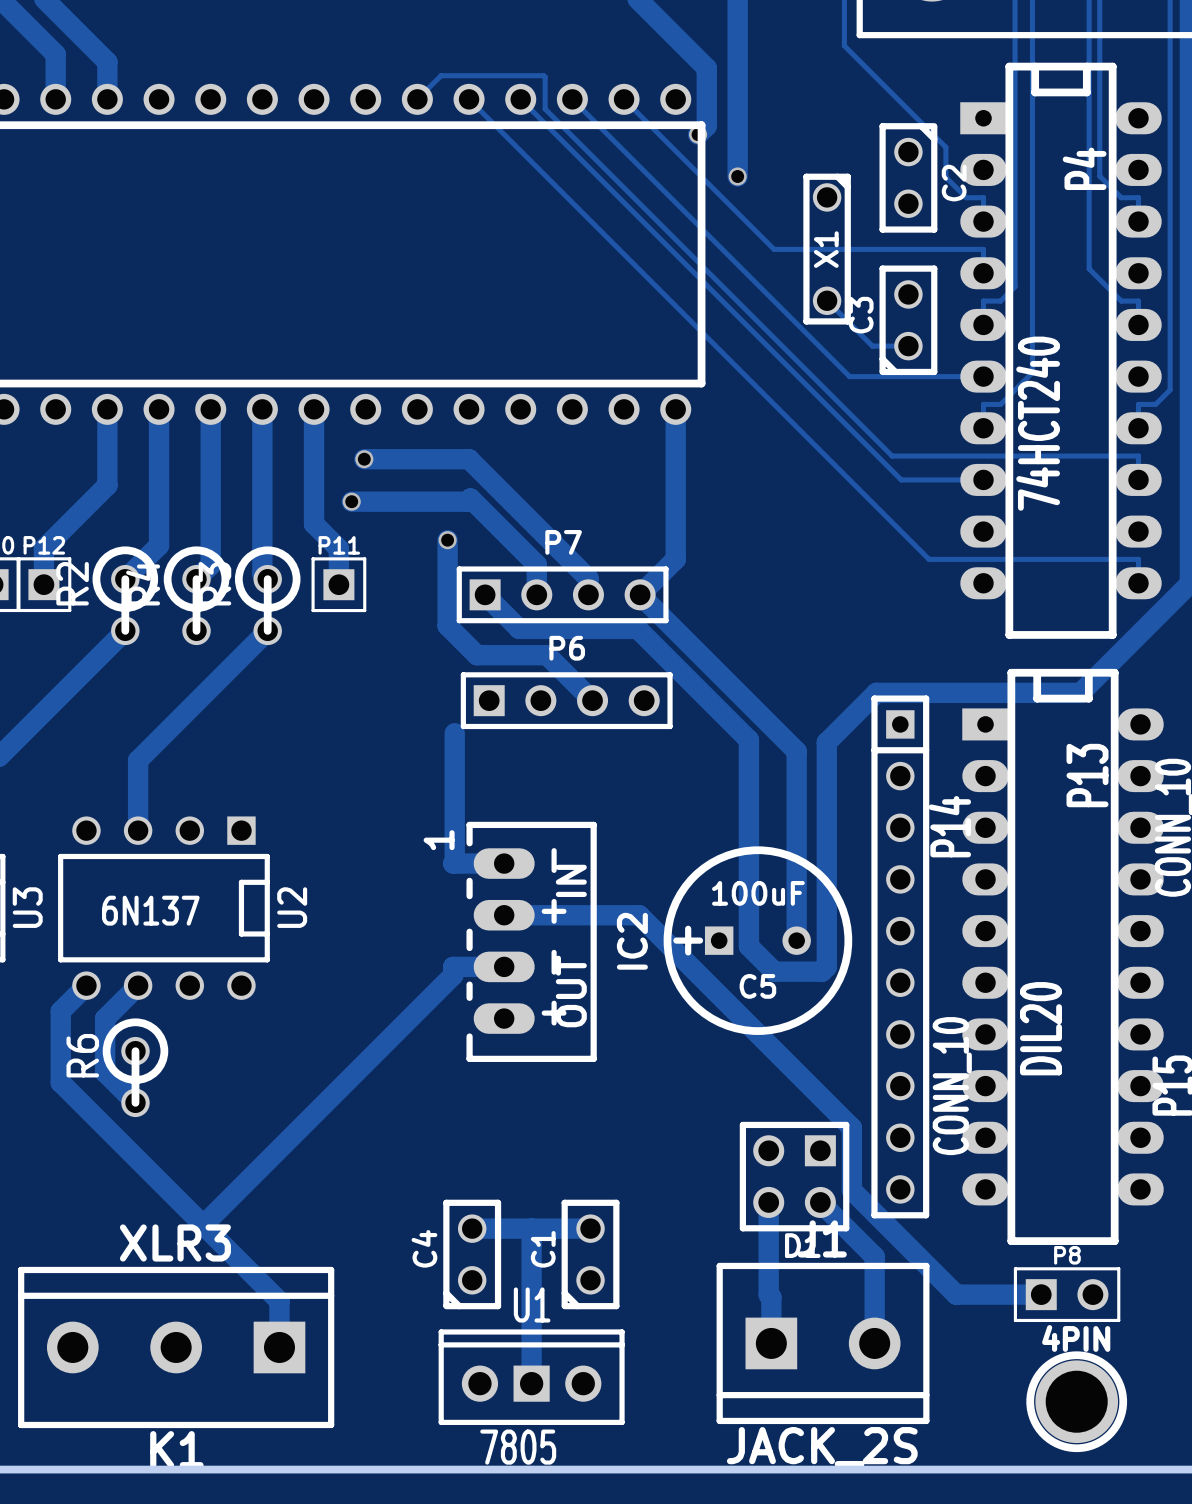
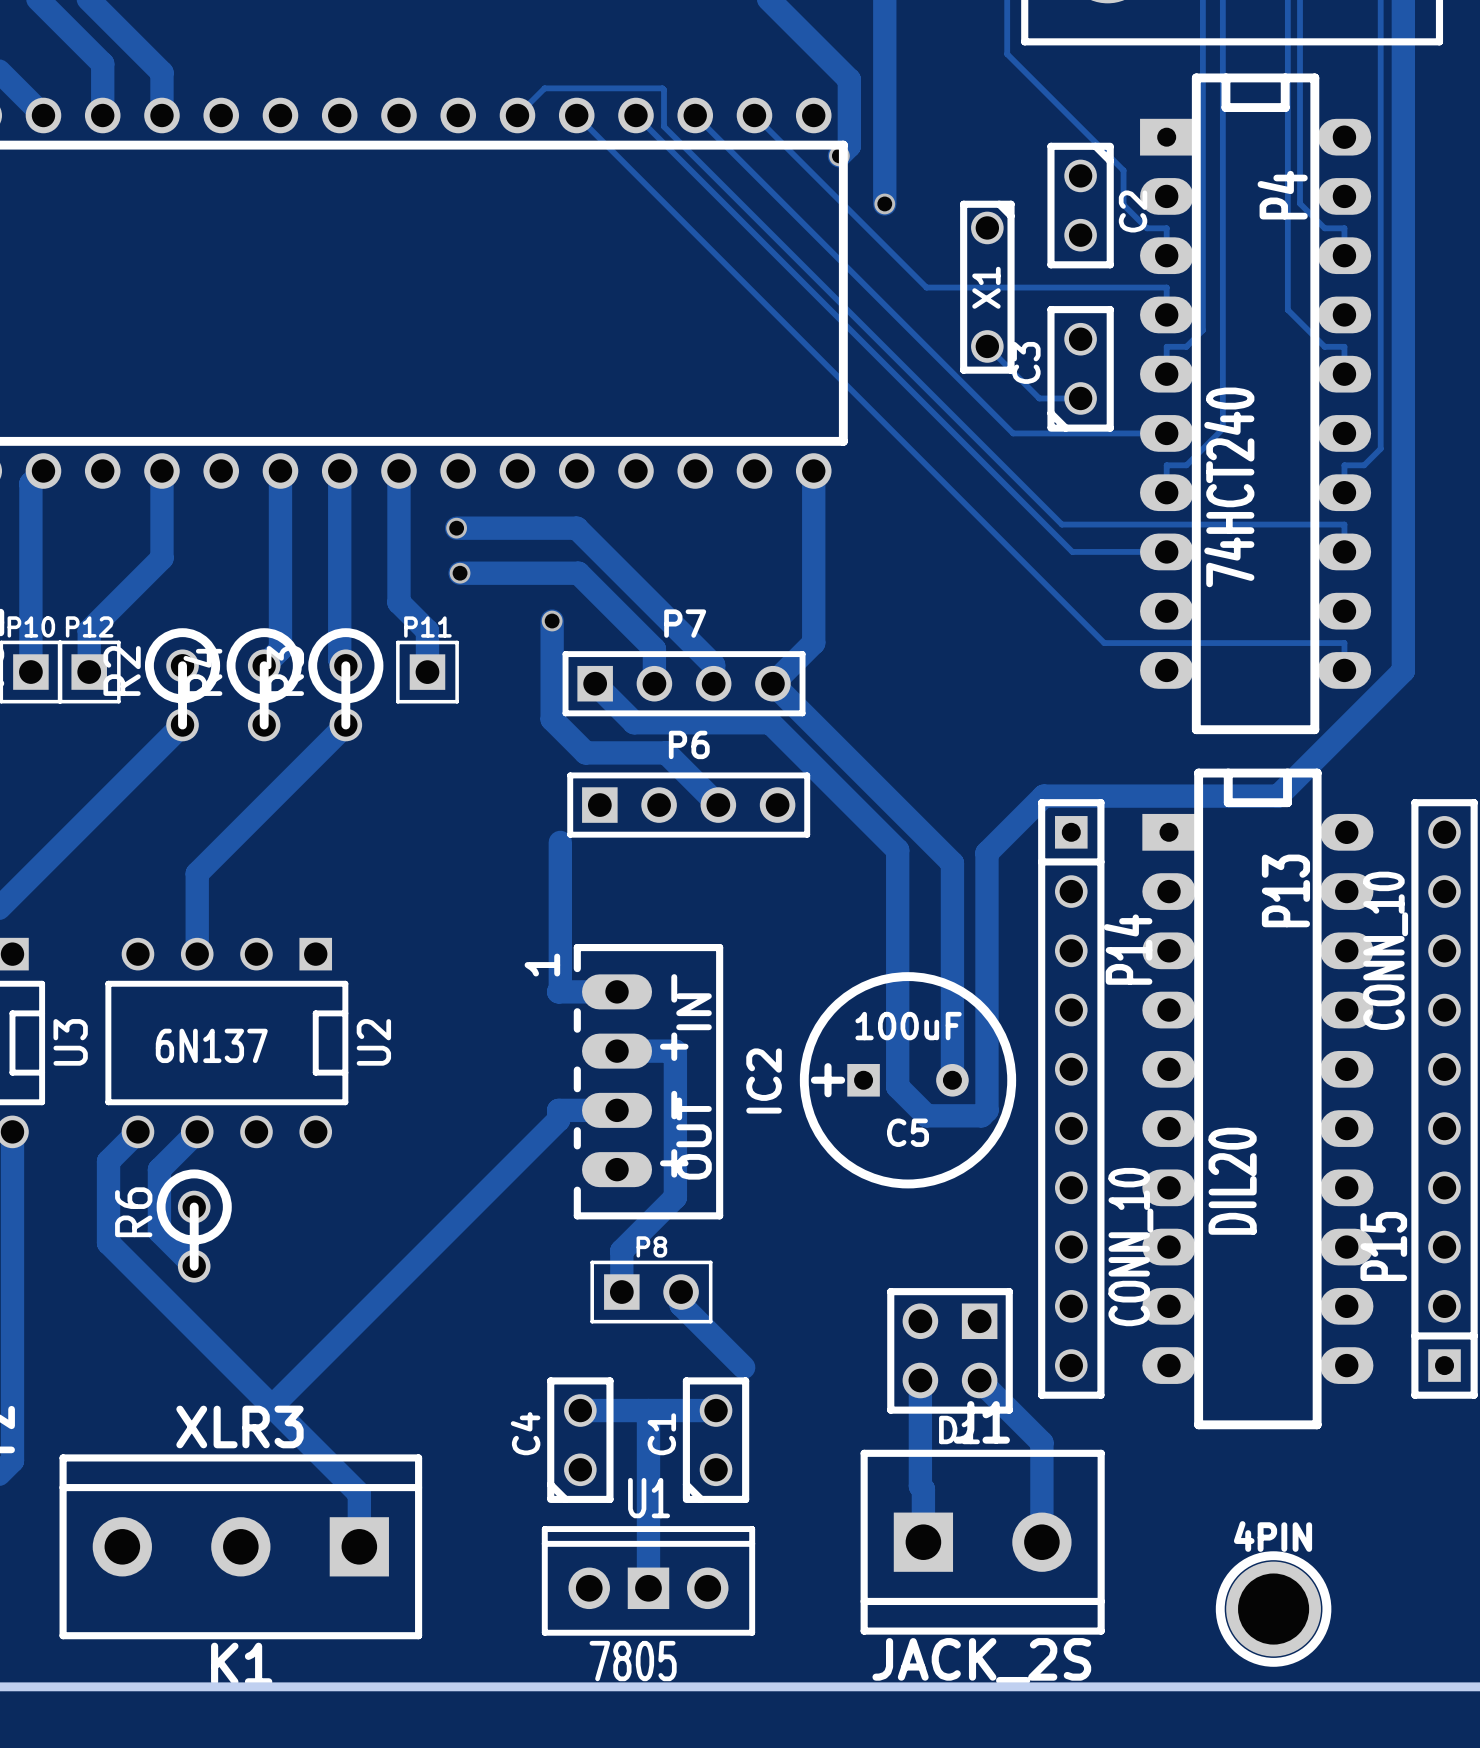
track: (159, 409) (159, 545) (125, 579) -> none
track: (470, 498) (467, 501) (351, 501) -> (578, 573) (460, 573)
via position: (351, 501) -> (460, 573)
track: (555, 915) (639, 915) (851, 1127) (851, 1190) (956, 1294) (1041, 1294) -> (675, 1051) (675, 1197) (621, 1250) (621, 1292)
track: none -> (681, 1292) (681, 1304) (743, 1367)
P8 position: (1067, 1294) -> (651, 1292)

